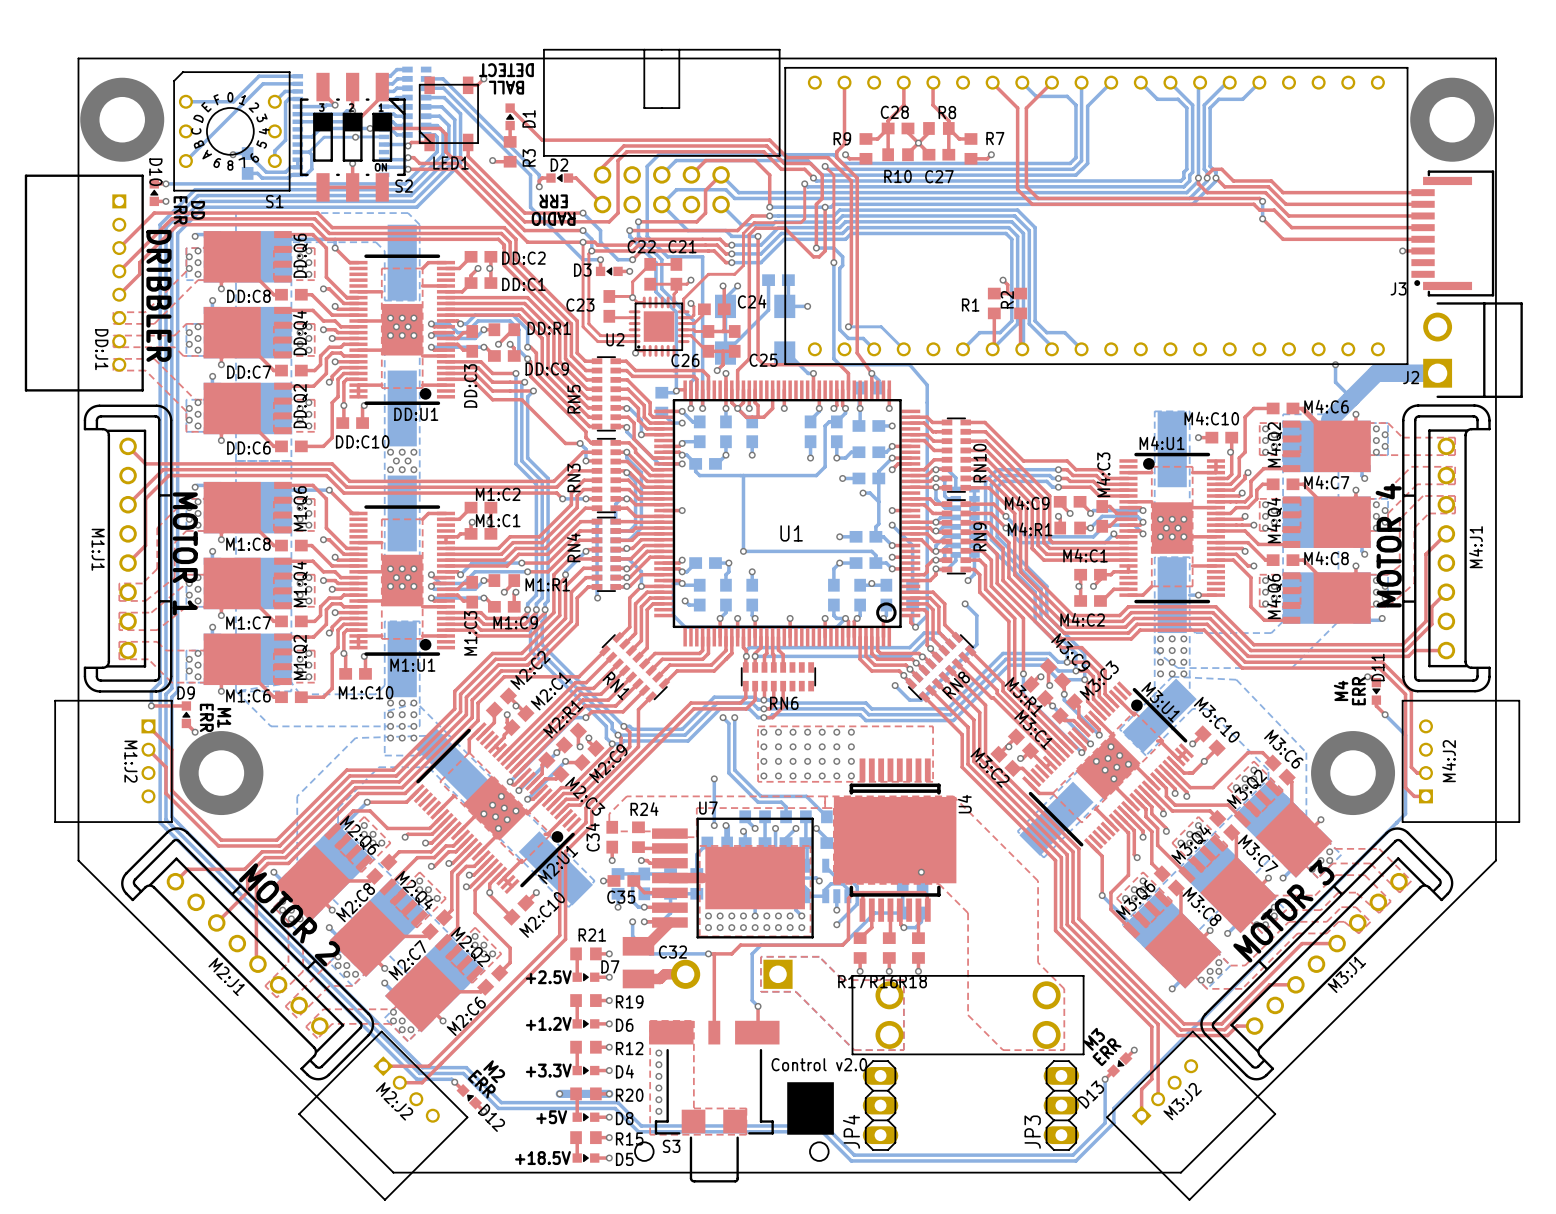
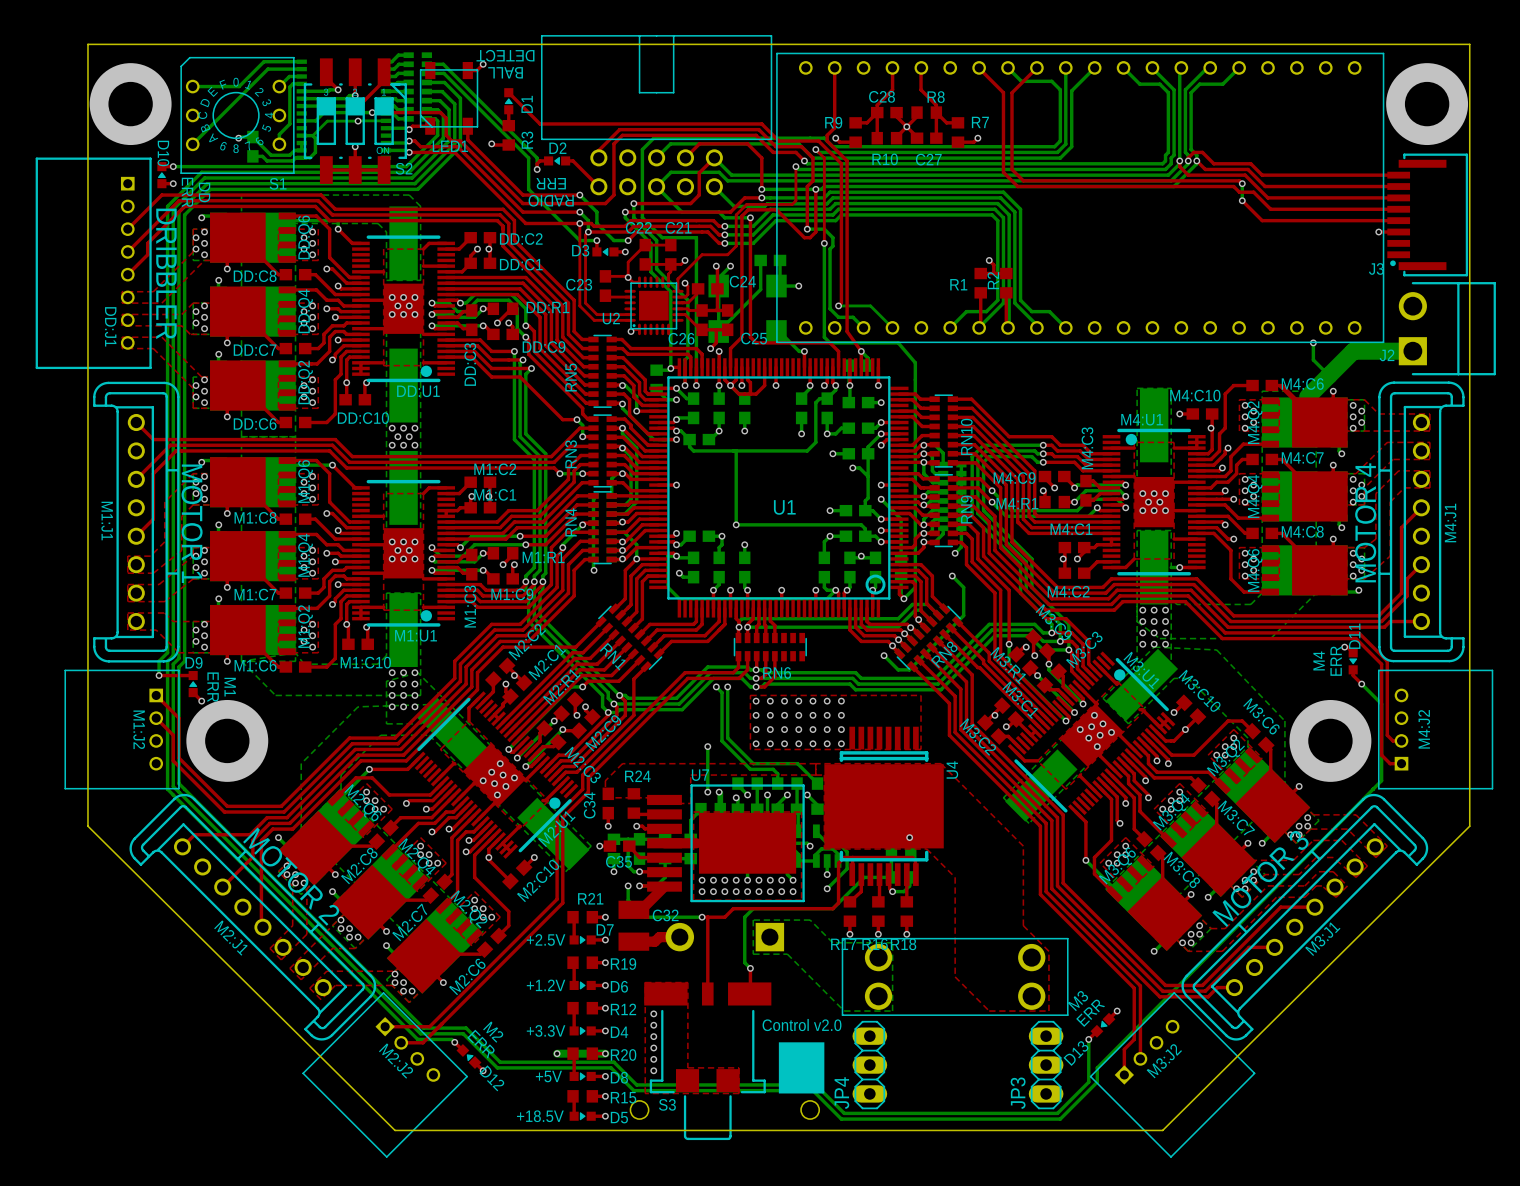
top zone outline: (760, 956) (819, 956) (842, 980) (903, 980) (903, 1050) (854, 1050) (795, 991) (760, 991) (760, 956) -> none

